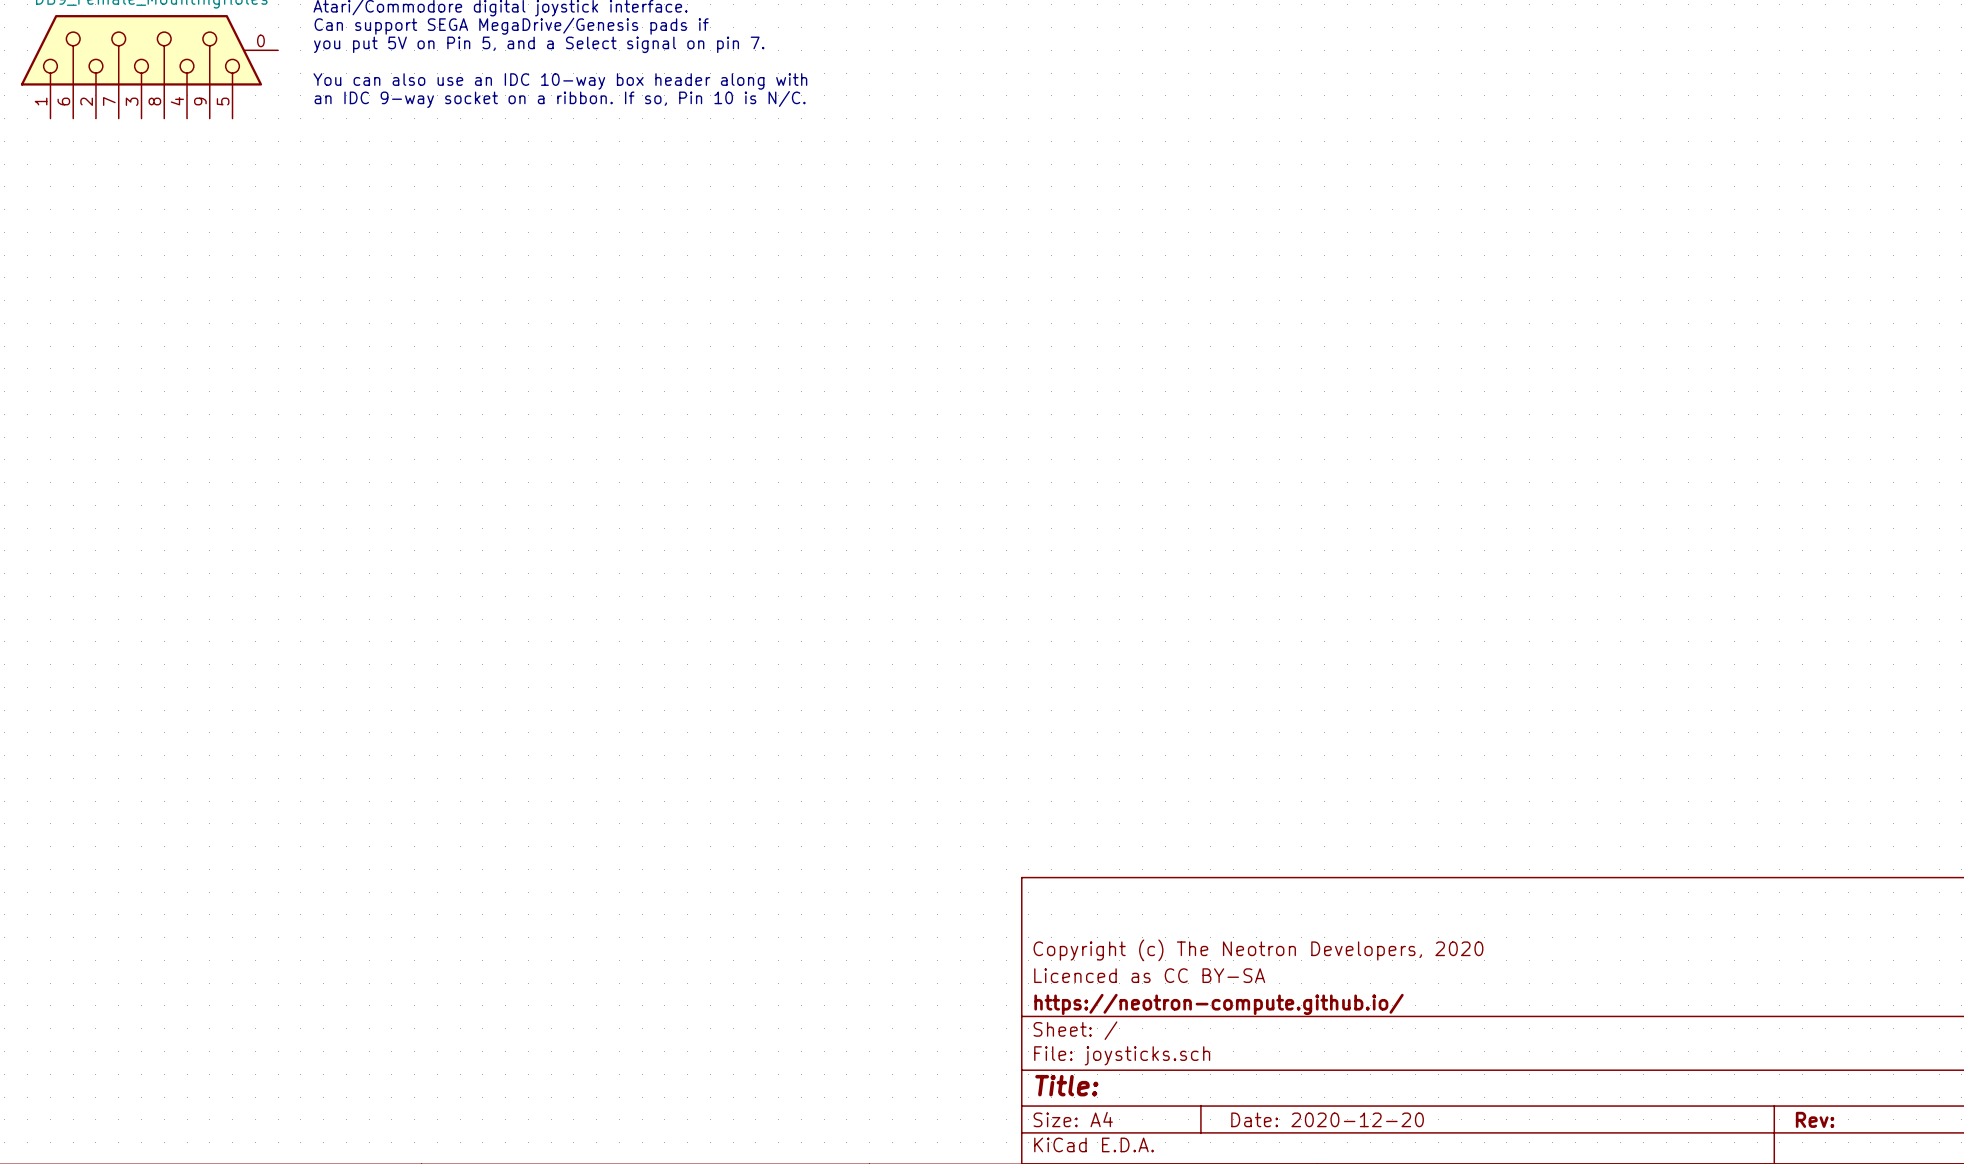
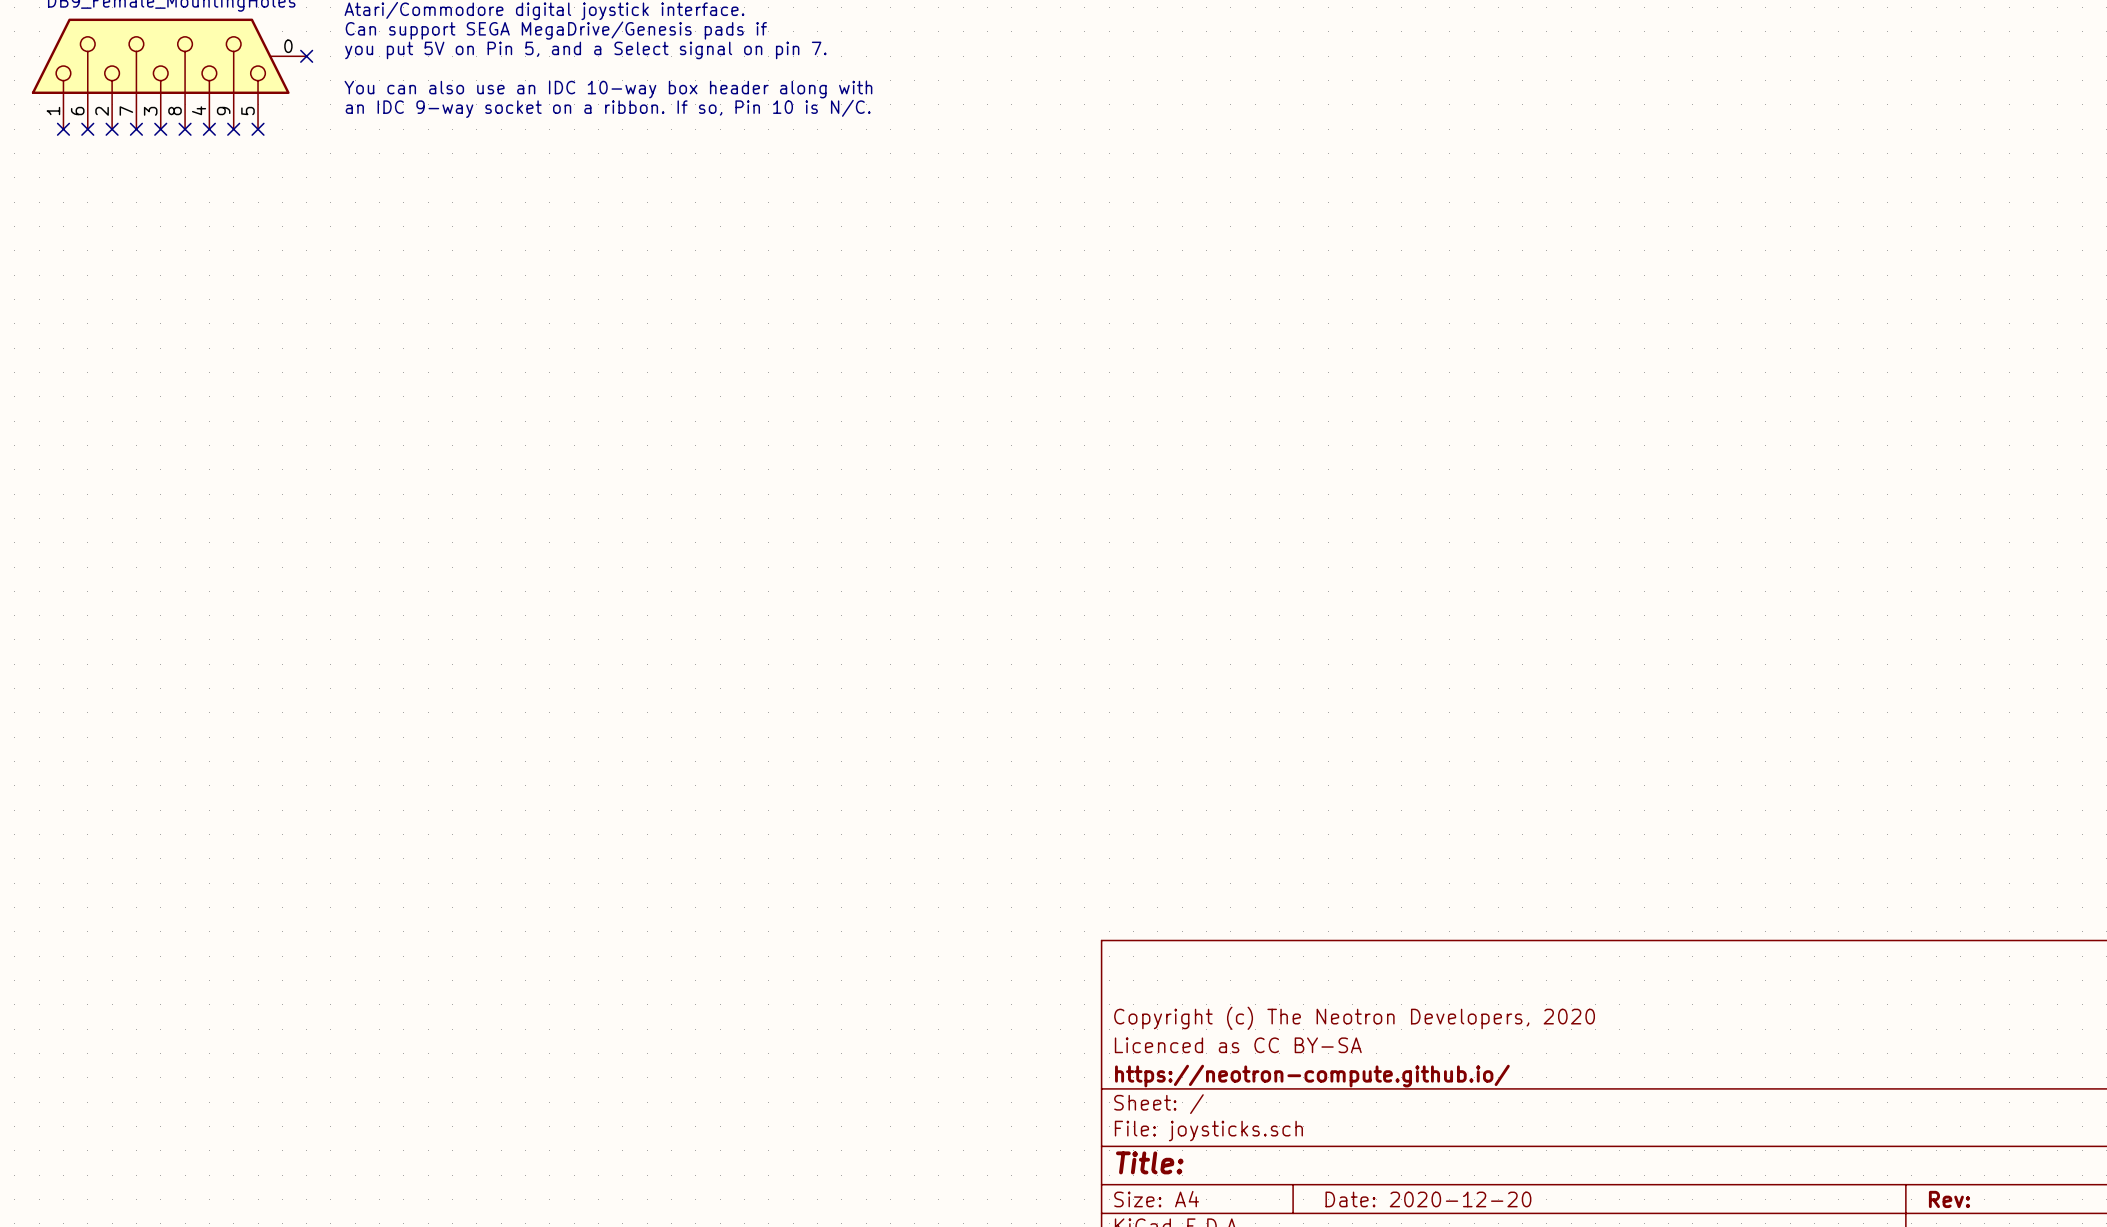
no-connect mark: none -> (306, 56)
no-connect mark: none -> (63, 129)
no-connect mark: none -> (87, 129)
no-connect mark: none -> (112, 129)
no-connect mark: none -> (136, 129)
no-connect mark: none -> (160, 129)
no-connect mark: none -> (185, 129)
no-connect mark: none -> (209, 129)
no-connect mark: none -> (233, 129)
no-connect mark: none -> (258, 129)

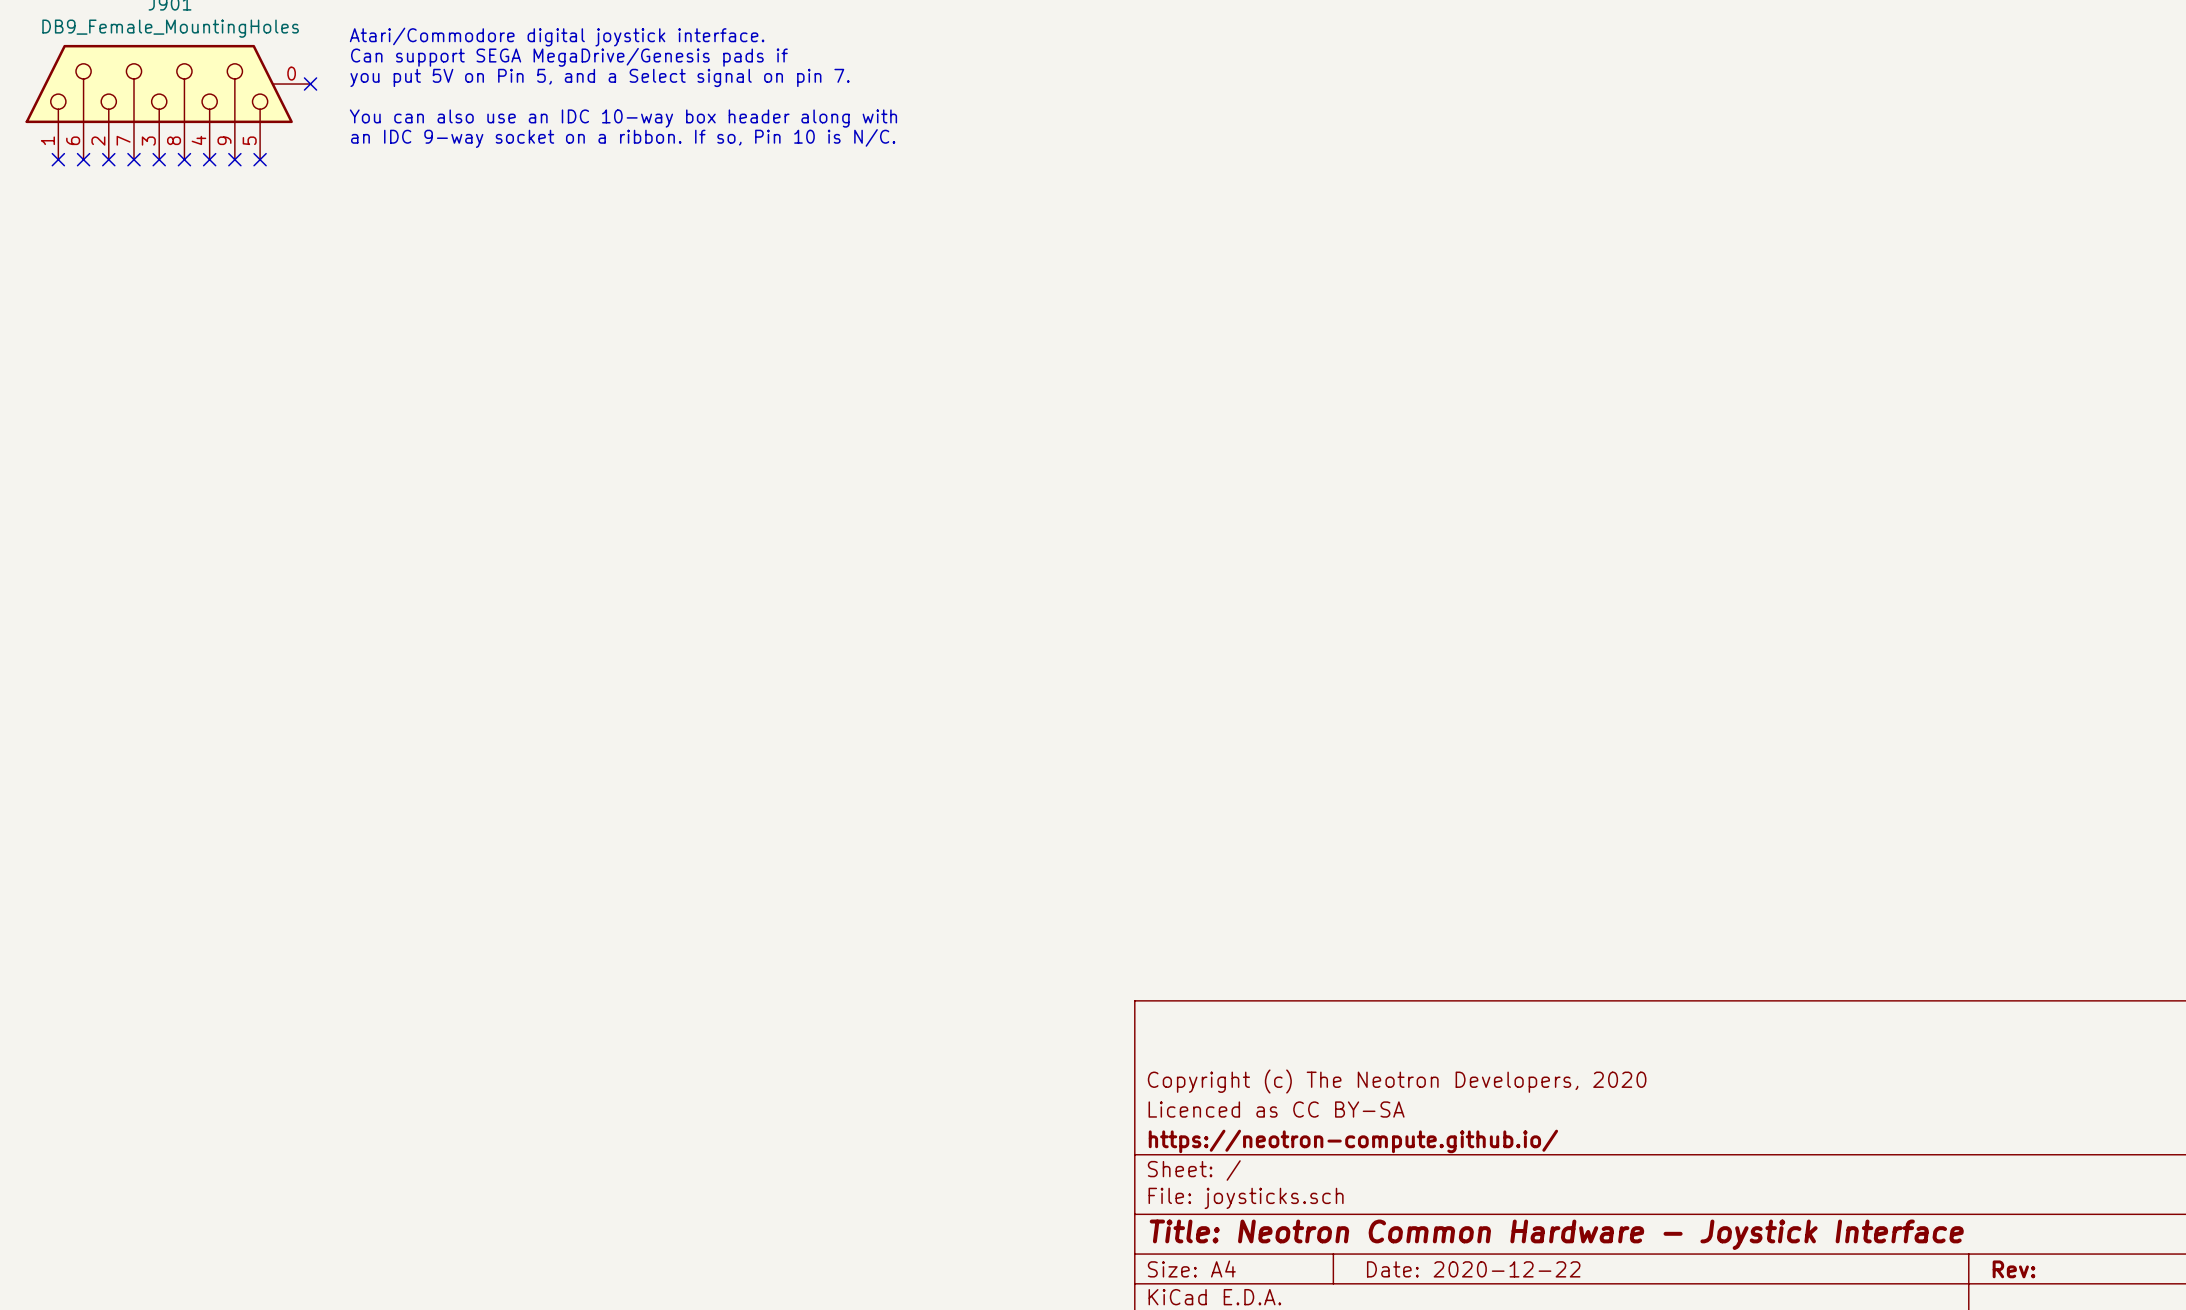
title block: Title: (1149, 1162) -> Title: Neotron Common Hardware - Joystick Interface (1556, 1234)
title block: Date: 2020-12-20 (1428, 1199) -> Date: 2020-12-22 (1473, 1269)

